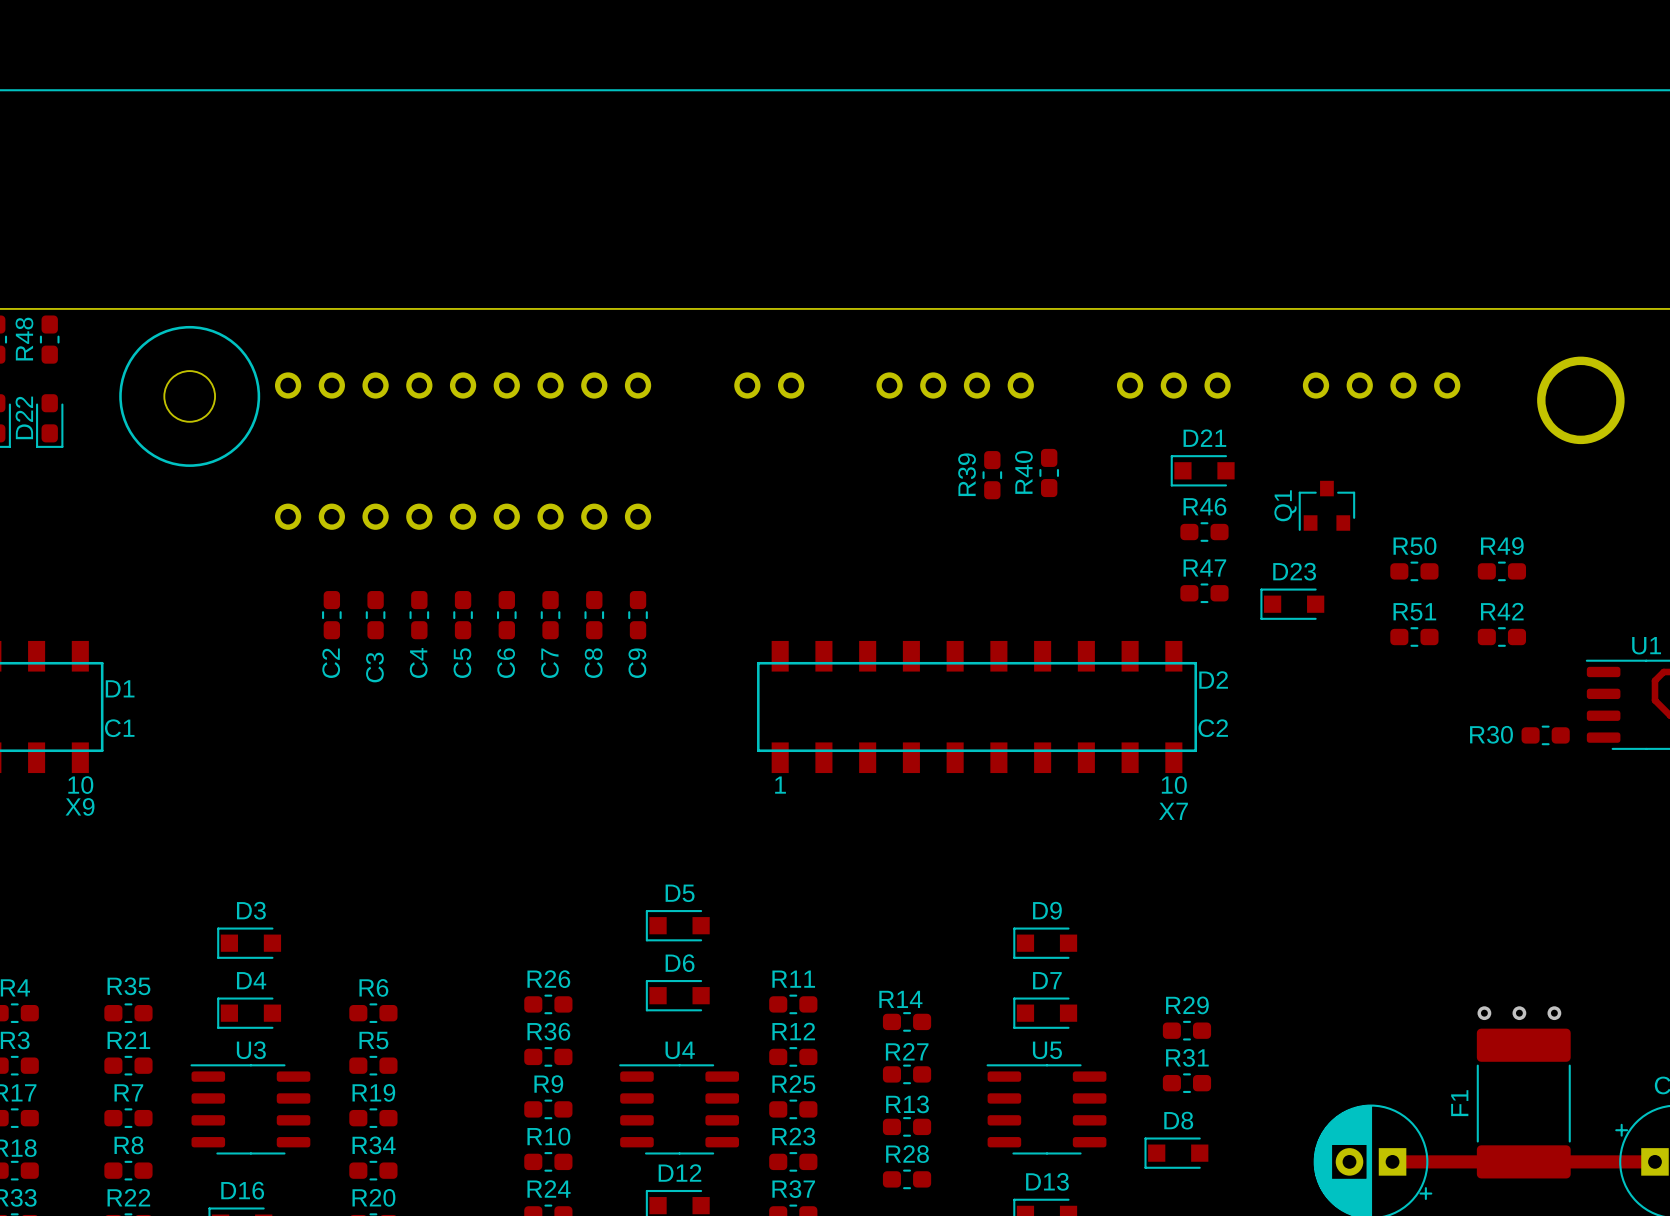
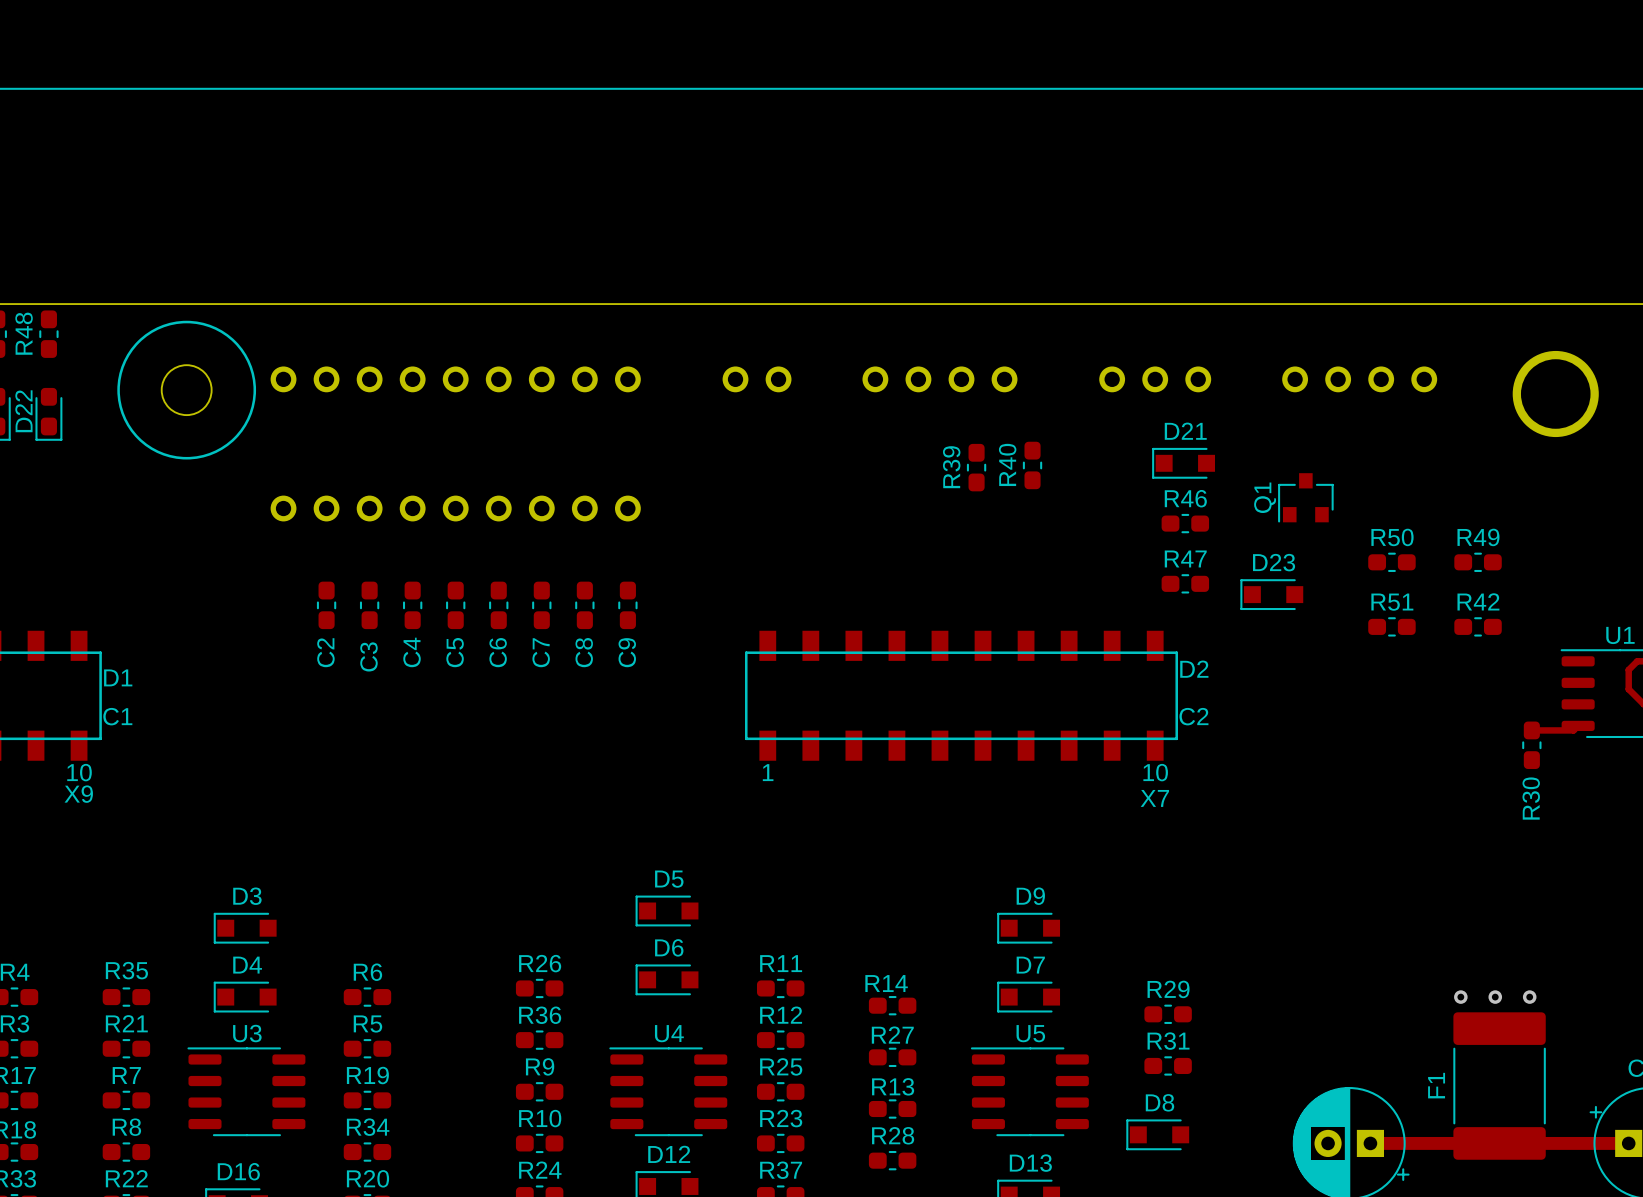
R30 name position: R30 (1491, 734) -> R30 (1531, 798)
R30 rotation: 0° (1545, 735) -> 90° clockwise (1531, 745)
track: none -> (1578, 725) (1573, 730) (1531, 730)

